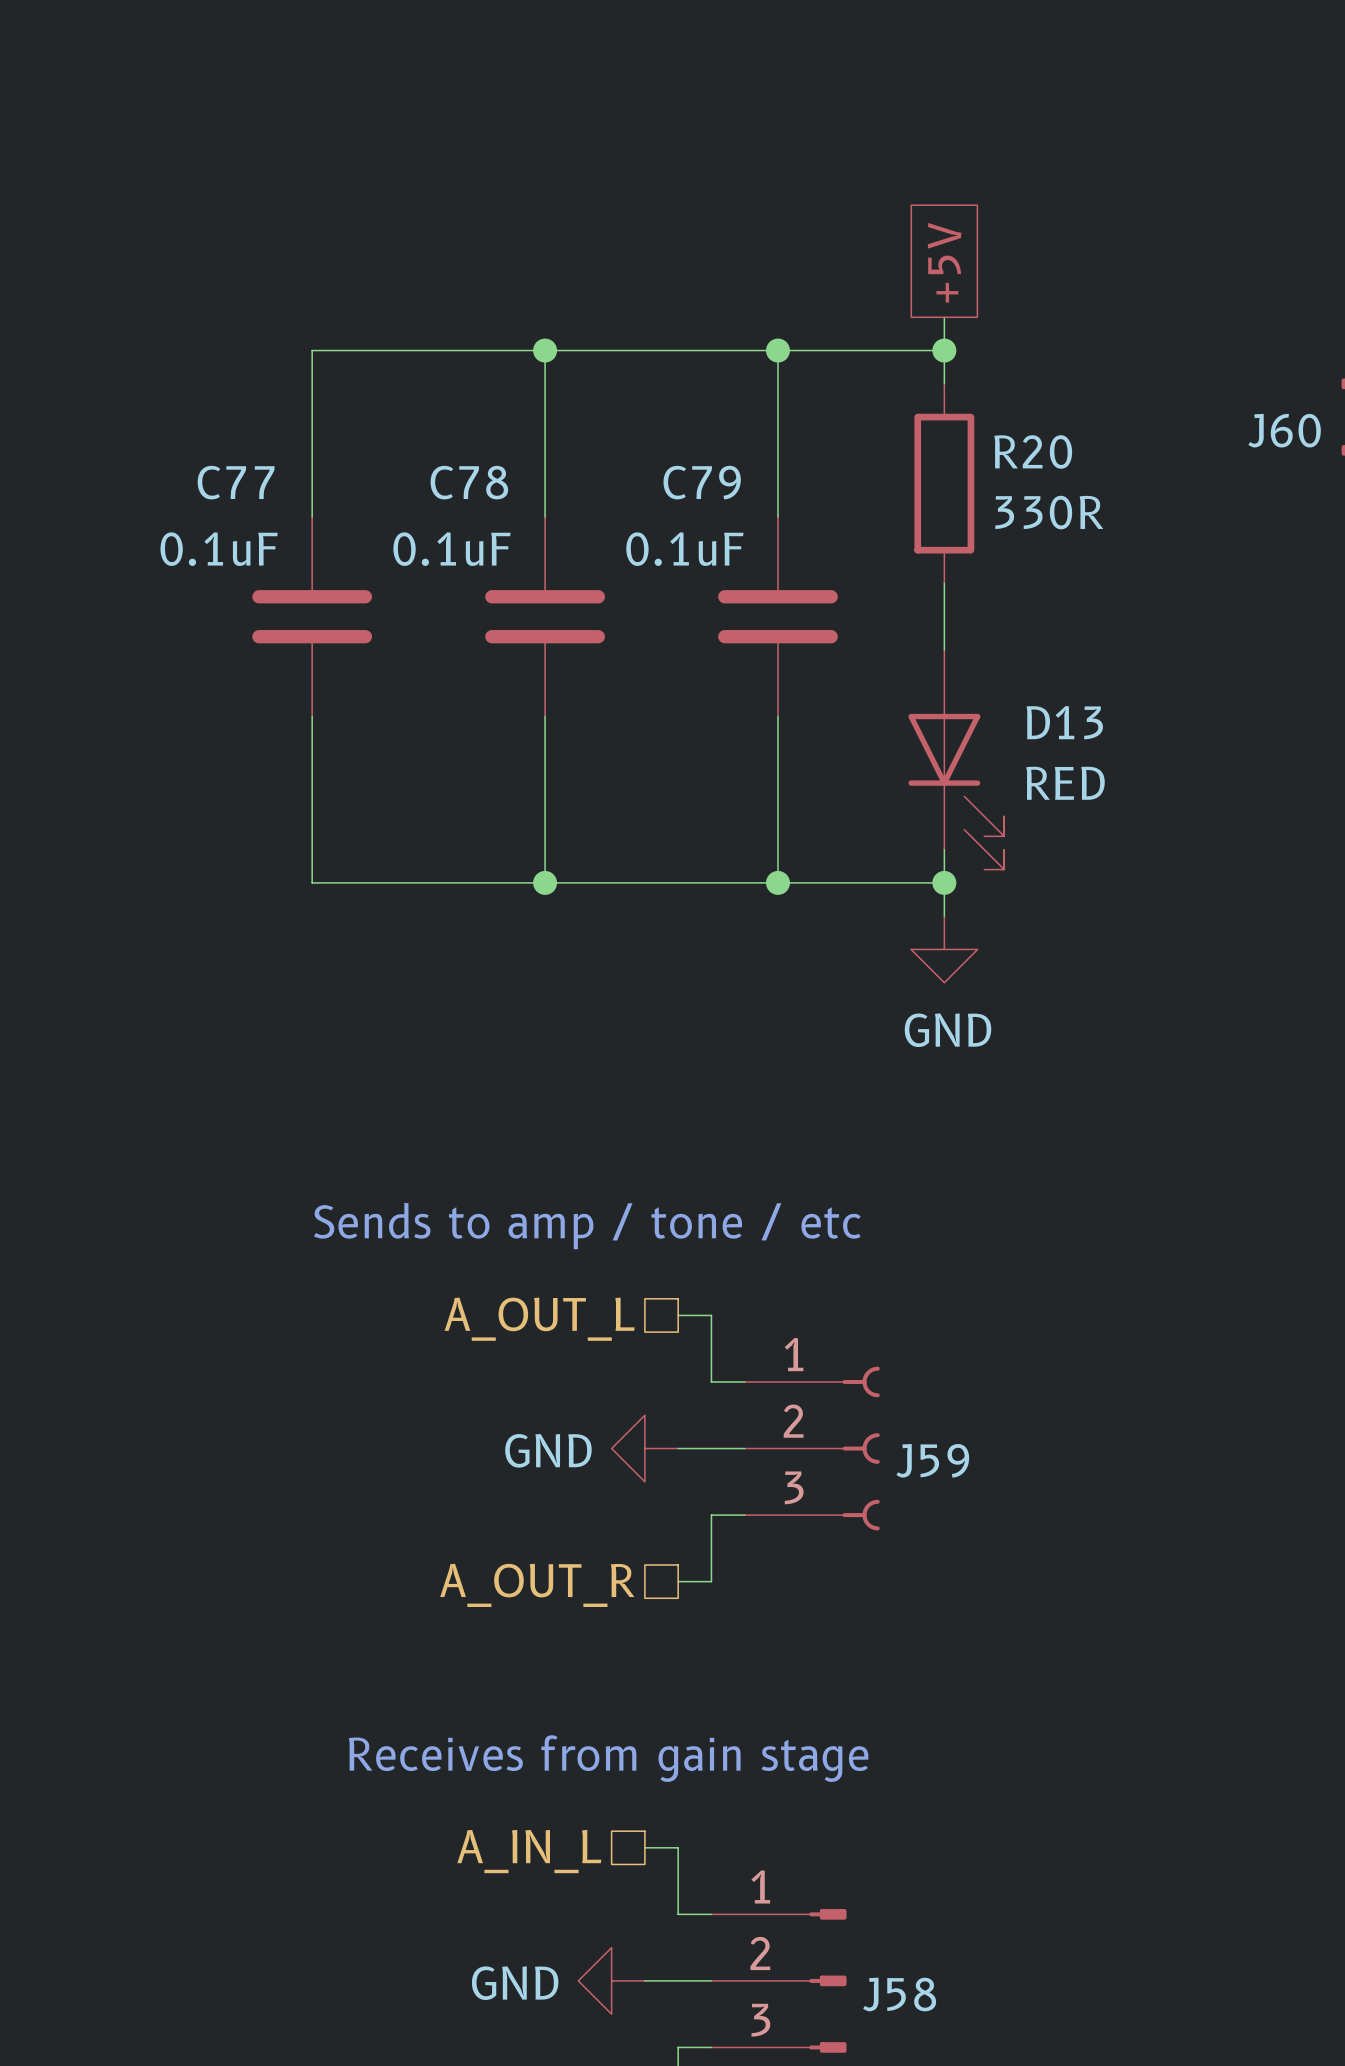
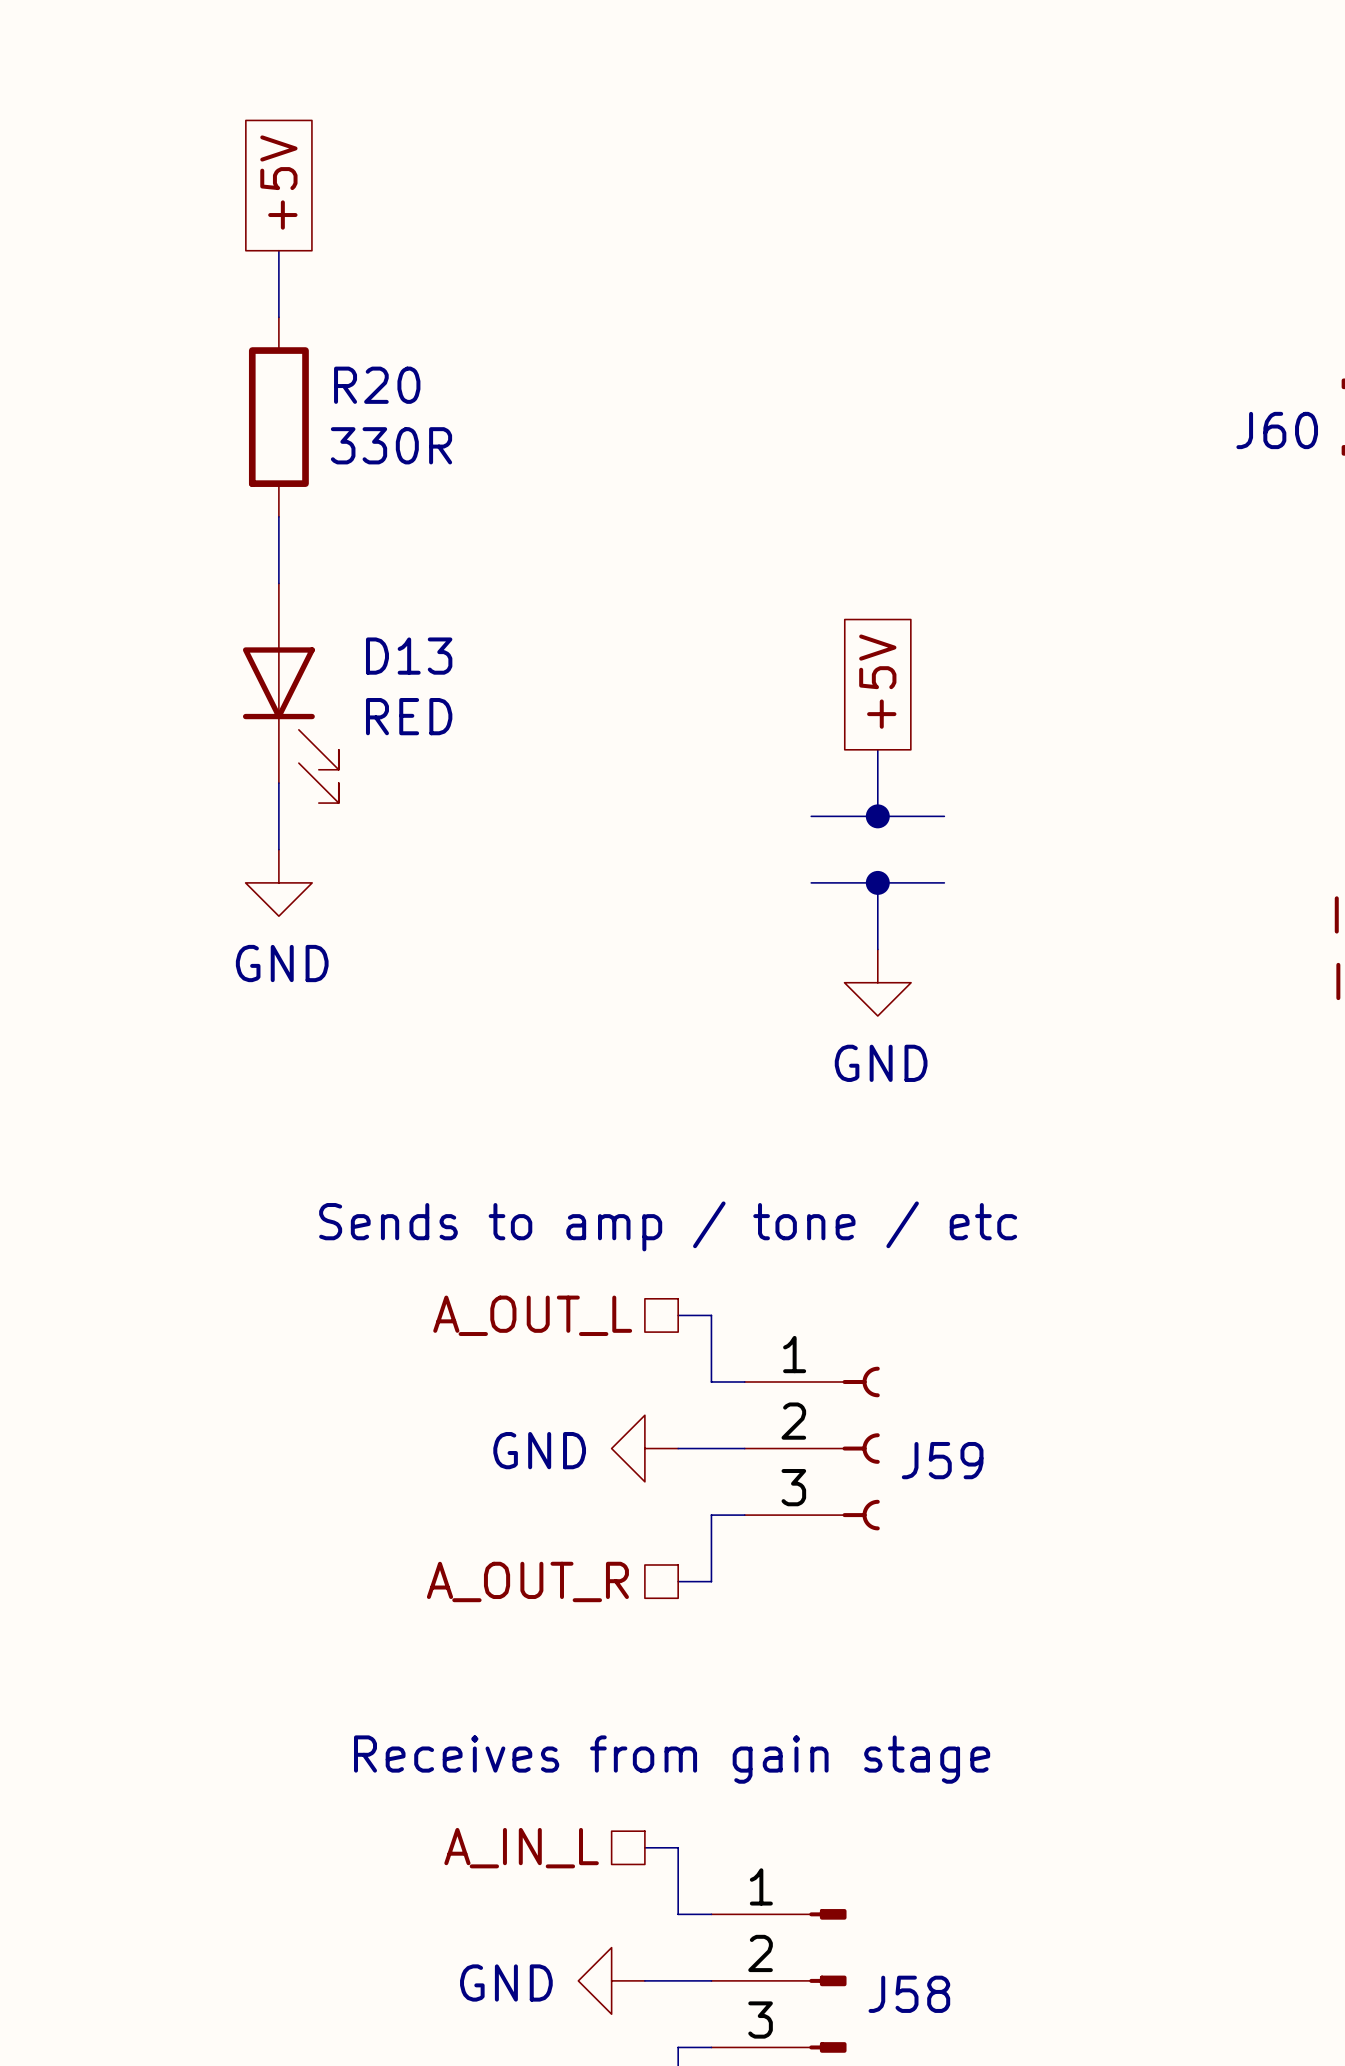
global label: none -> +5V (278, 182)
wire: none -> (278, 250) (278, 317)
global label: +5V (944, 262) -> none
wire: (944, 317) (944, 383) -> none
wire: (545, 350) (545, 516) -> none
junction: (545, 350) -> none
wire: (777, 350) (777, 516) -> none
junction: (777, 350) -> none
wire: (944, 350) (312, 350) (312, 516) -> none
junction: (944, 350) -> none
R20 position: (944, 483) -> (278, 417)
wire: none -> (278, 516) (278, 583)
wire: (944, 583) (944, 650) -> (877, 749) (877, 816)
C77: 0.1uF (312, 616) -> none
C78: 0.1uF (545, 616) -> none
C79: 0.1uF (777, 616) -> none
global label: none -> +5V (877, 681)
wire: (312, 716) (312, 882) (811, 882) -> none
wire: (545, 716) (545, 882) -> none
wire: (777, 716) (777, 882) -> none
D13 position: (956, 759) -> (290, 693)
wire: none -> (278, 783) (278, 849)
wire: none -> (811, 816) (944, 816)
junction: none -> (877, 816)
wire: (944, 849) (944, 916) -> (877, 882) (877, 949)
power symbol: none -> GND (278, 882)
junction: (545, 882) -> none
junction: (777, 882) -> none
junction: none -> (877, 882)
junction: (944, 882) -> none
power symbol position: GND (944, 949) -> GND (877, 982)

